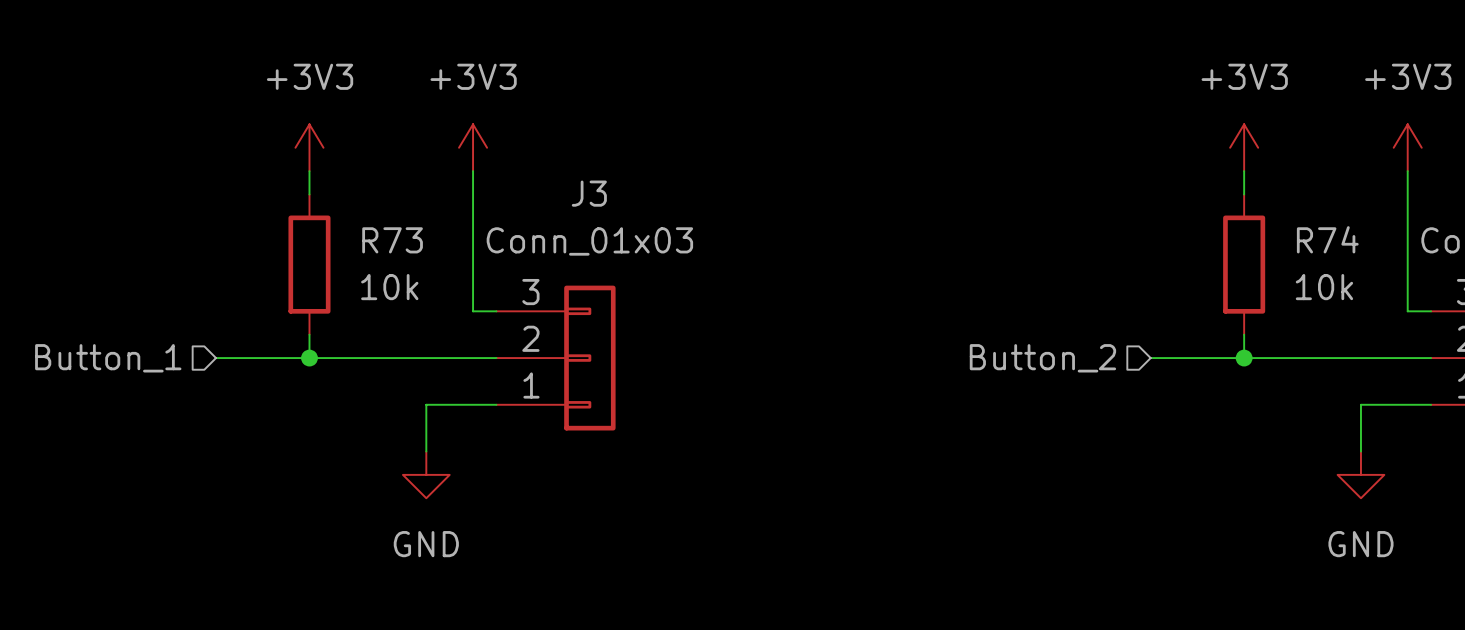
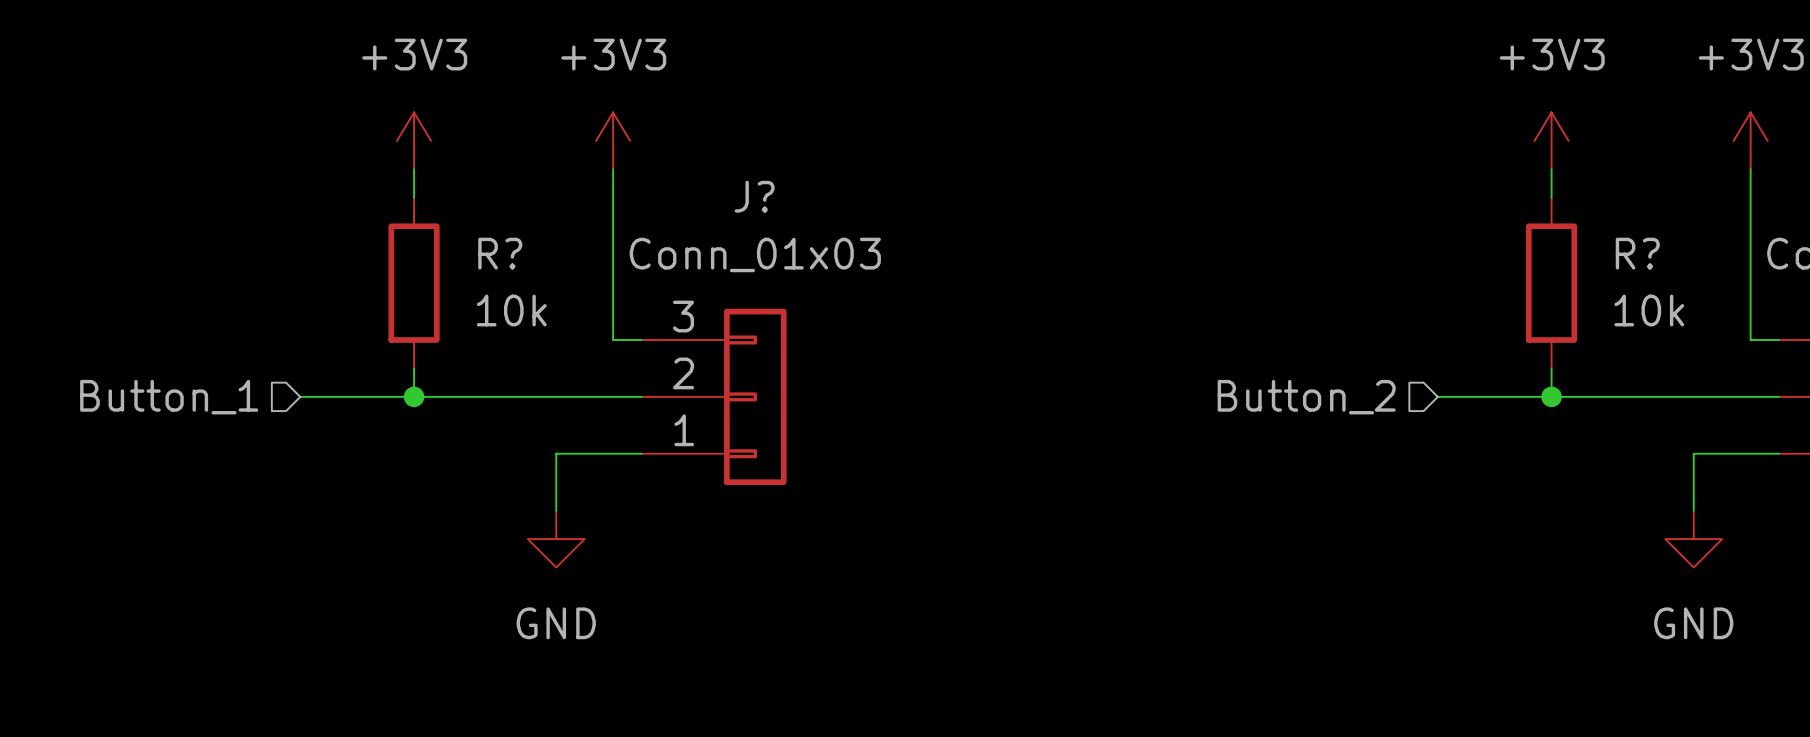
J3 name: J3 (589, 193) -> J? (754, 196)
R74 name: R74 (1327, 239) -> R? (1637, 253)
R73 name: R73 (392, 240) -> R? (500, 253)

